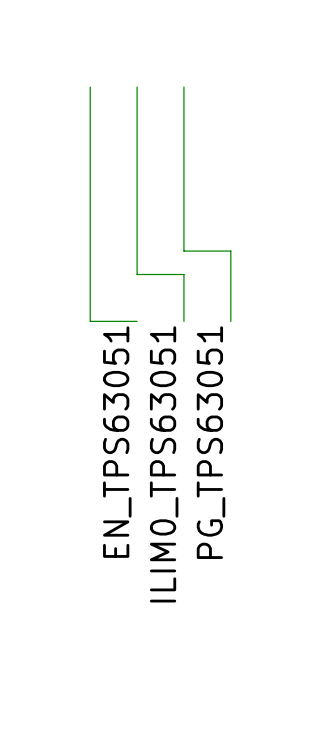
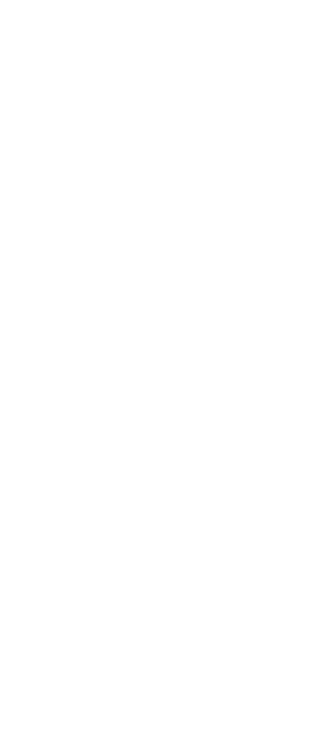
wire: (90, 87) (90, 321) (137, 321) -> none
wire: (137, 87) (137, 274) (183, 274) (183, 321) -> none
wire: (183, 87) (183, 251) (230, 251) (230, 321) -> none
label: EN_TPS63051 (117, 442) -> none
label: PG_TPS63051 (211, 442) -> none
label: ILIM0_TPS63051 (164, 464) -> none

